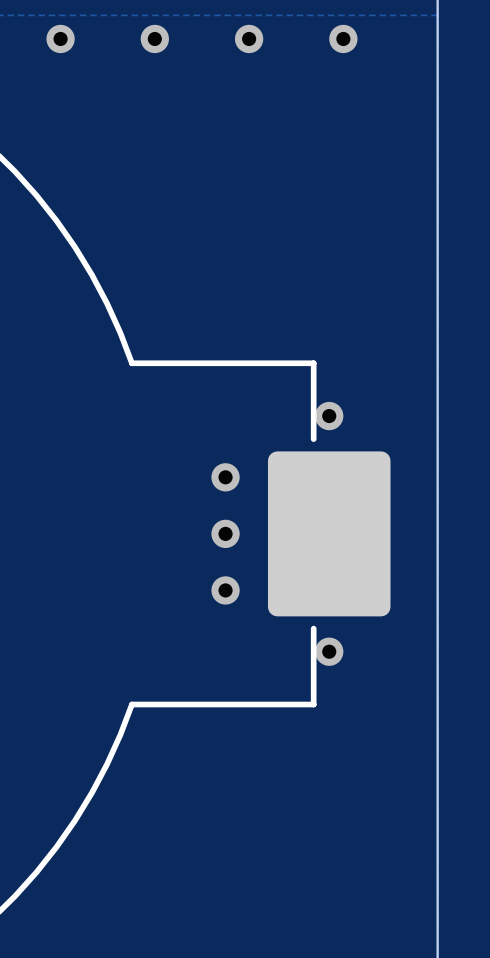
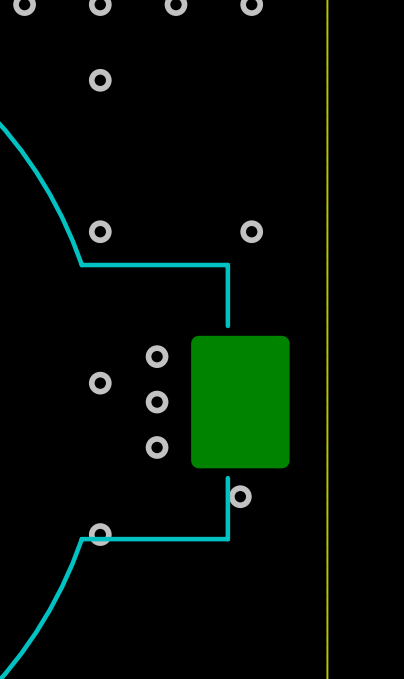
via: none -> (100, 80)
via: none -> (100, 231)
via position: (329, 416) -> (251, 231)
via: none -> (100, 383)
via: none -> (100, 534)

